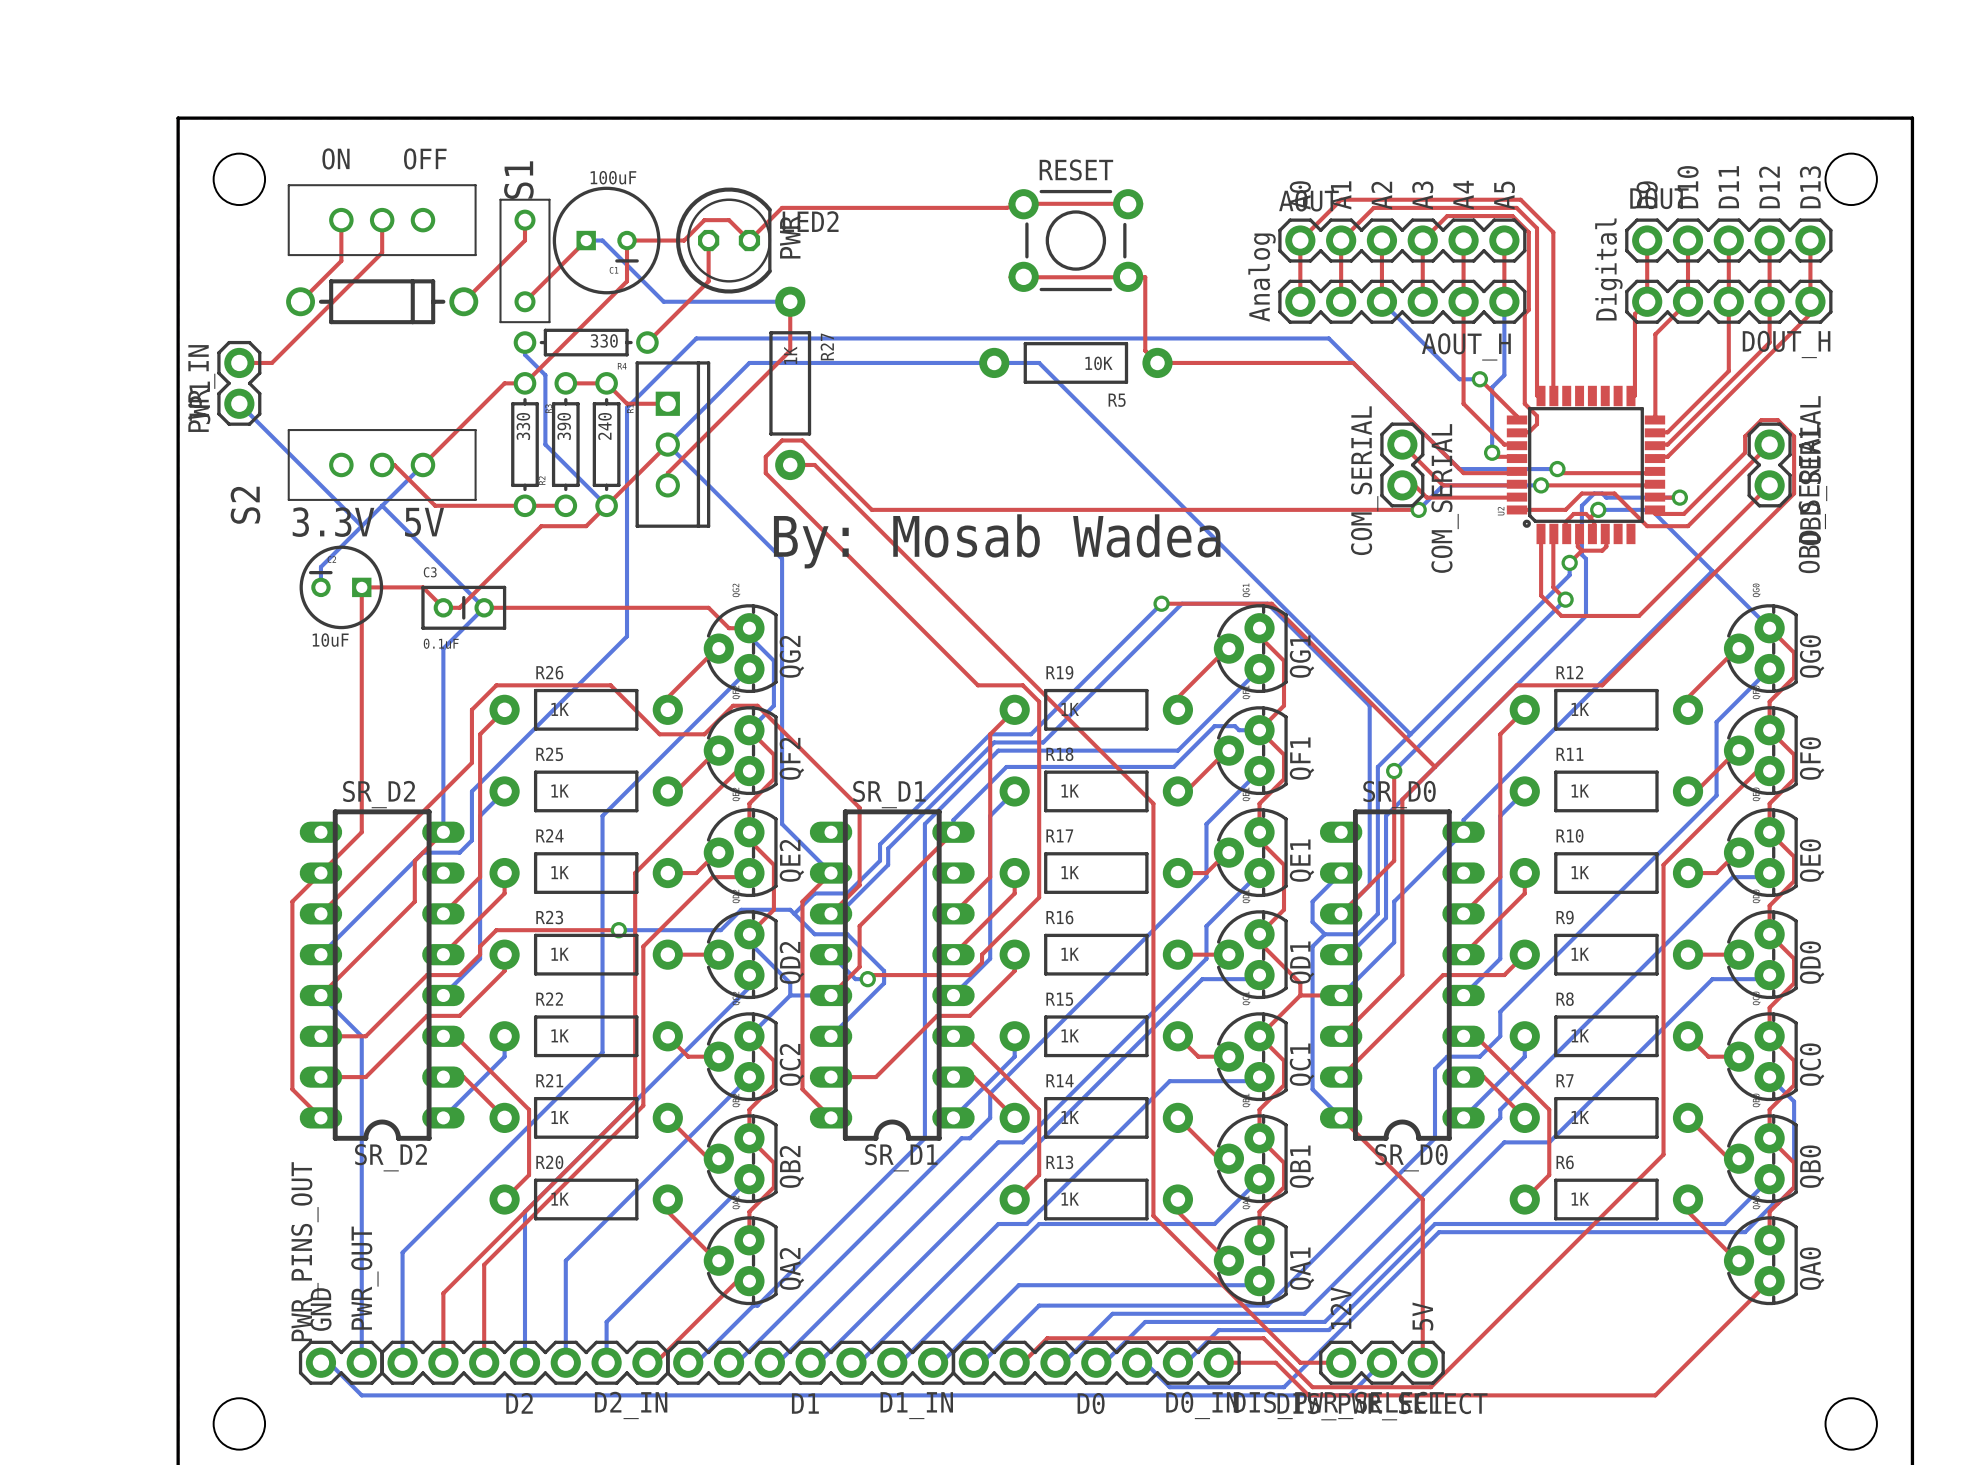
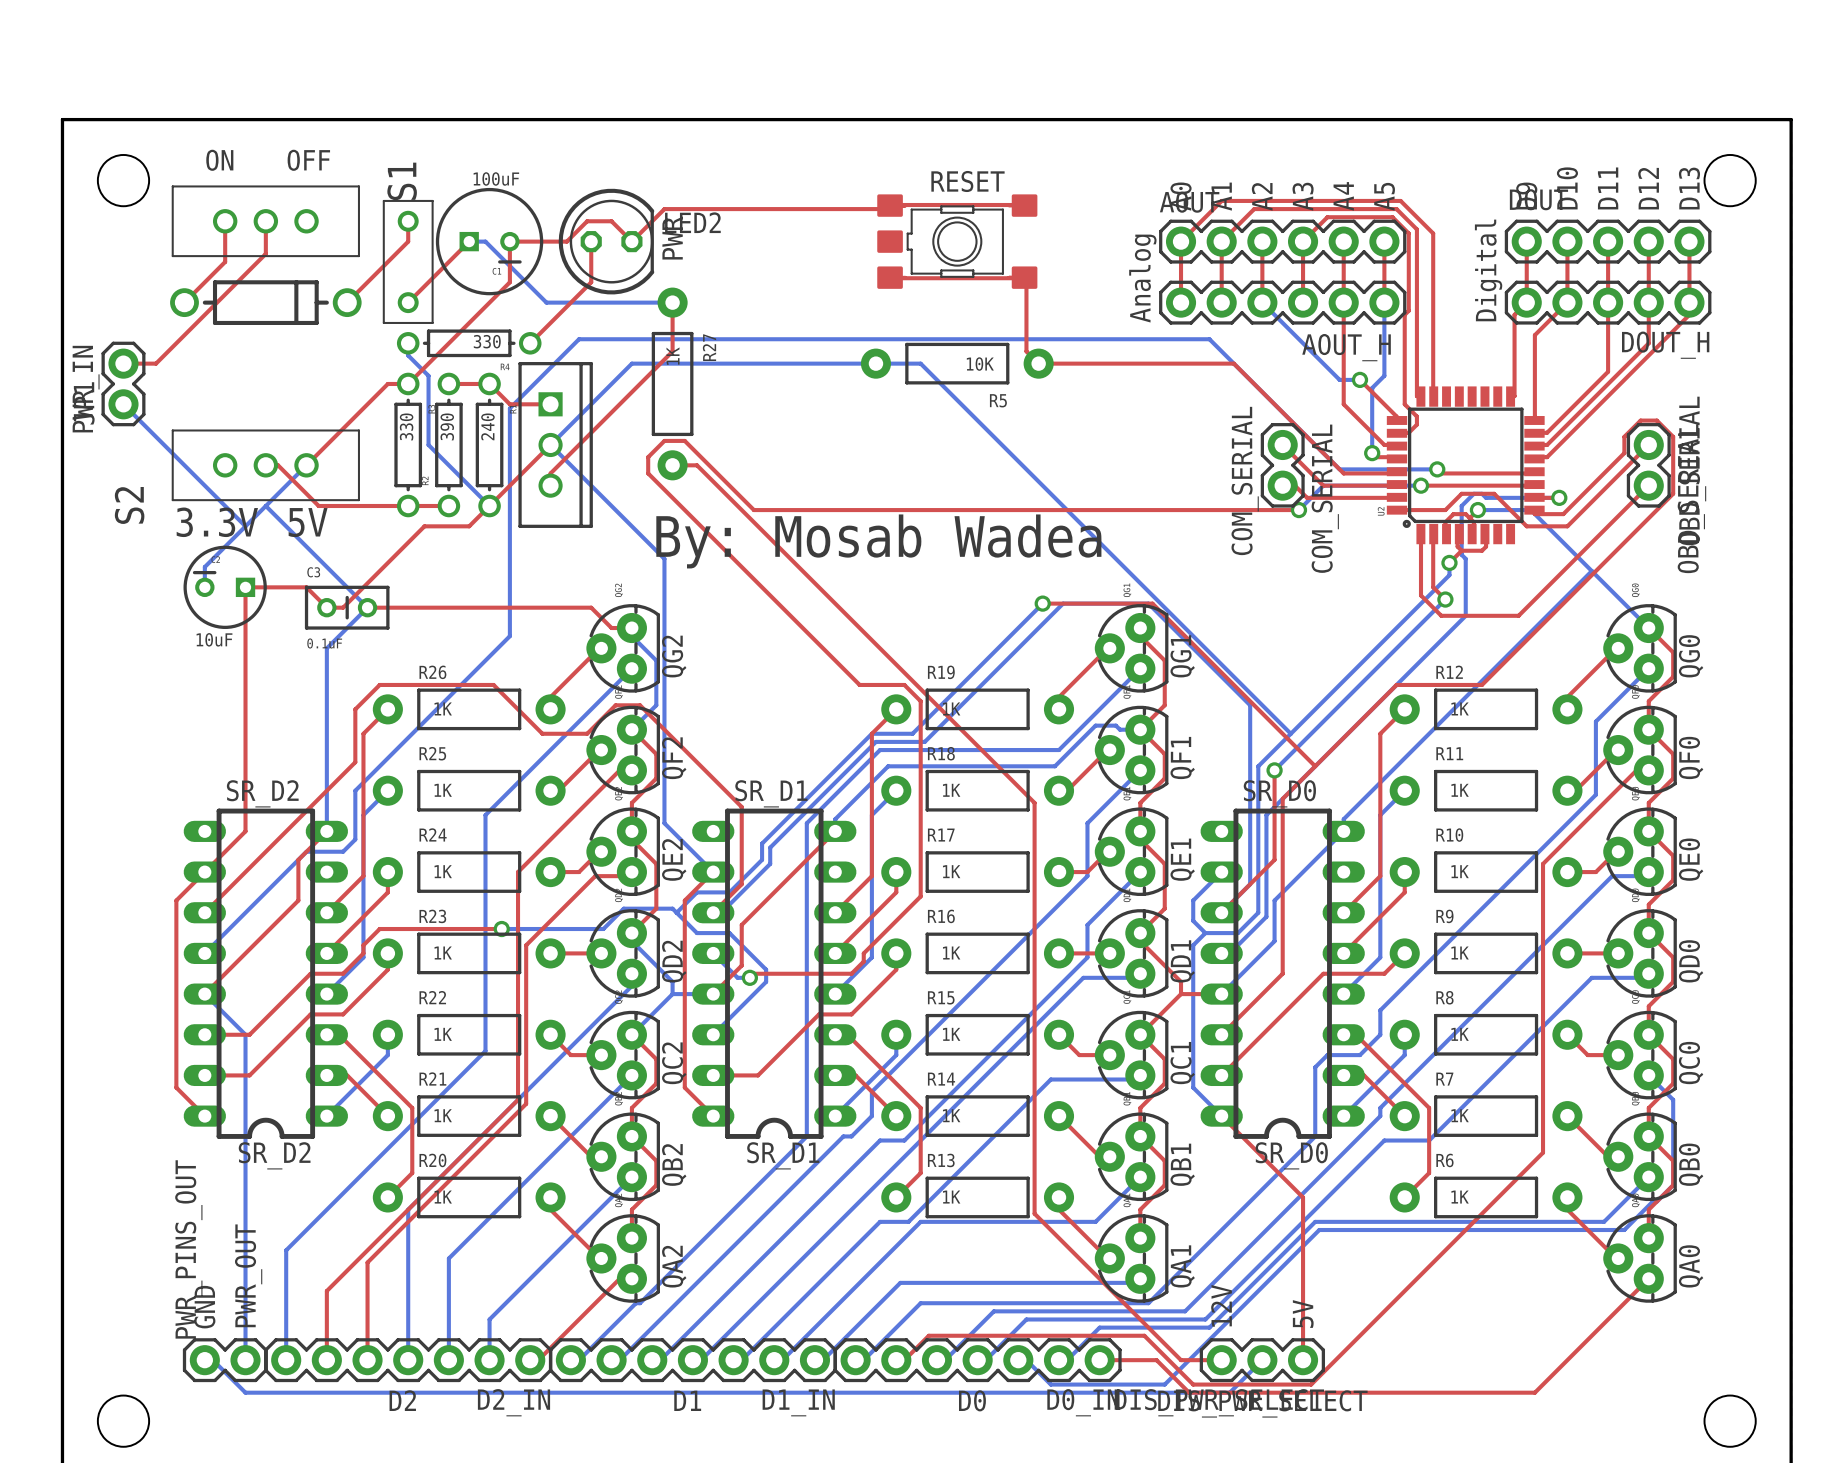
RESET footprint: [1008, 189, 1144, 292] -> [877, 194, 1038, 289]

